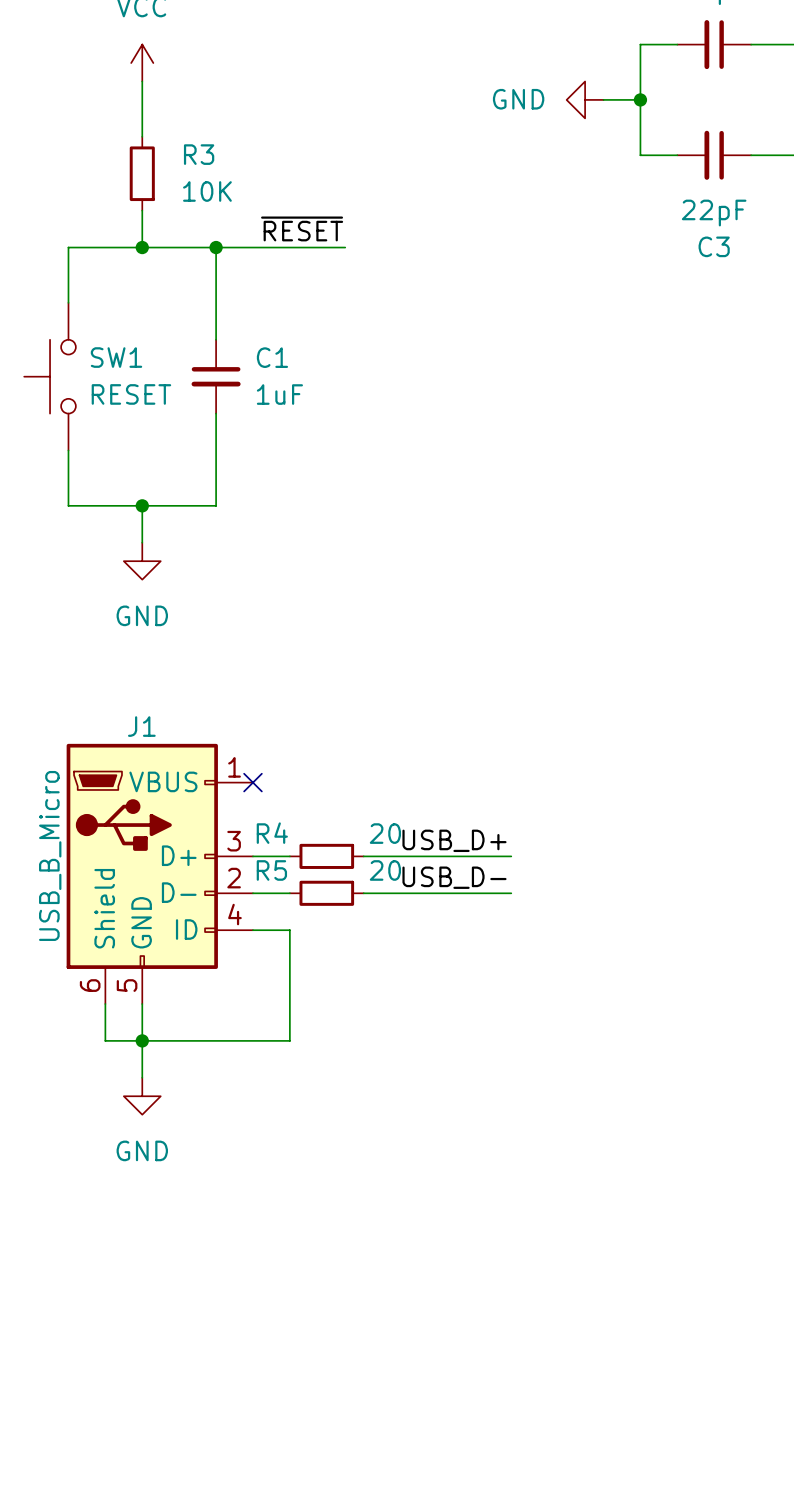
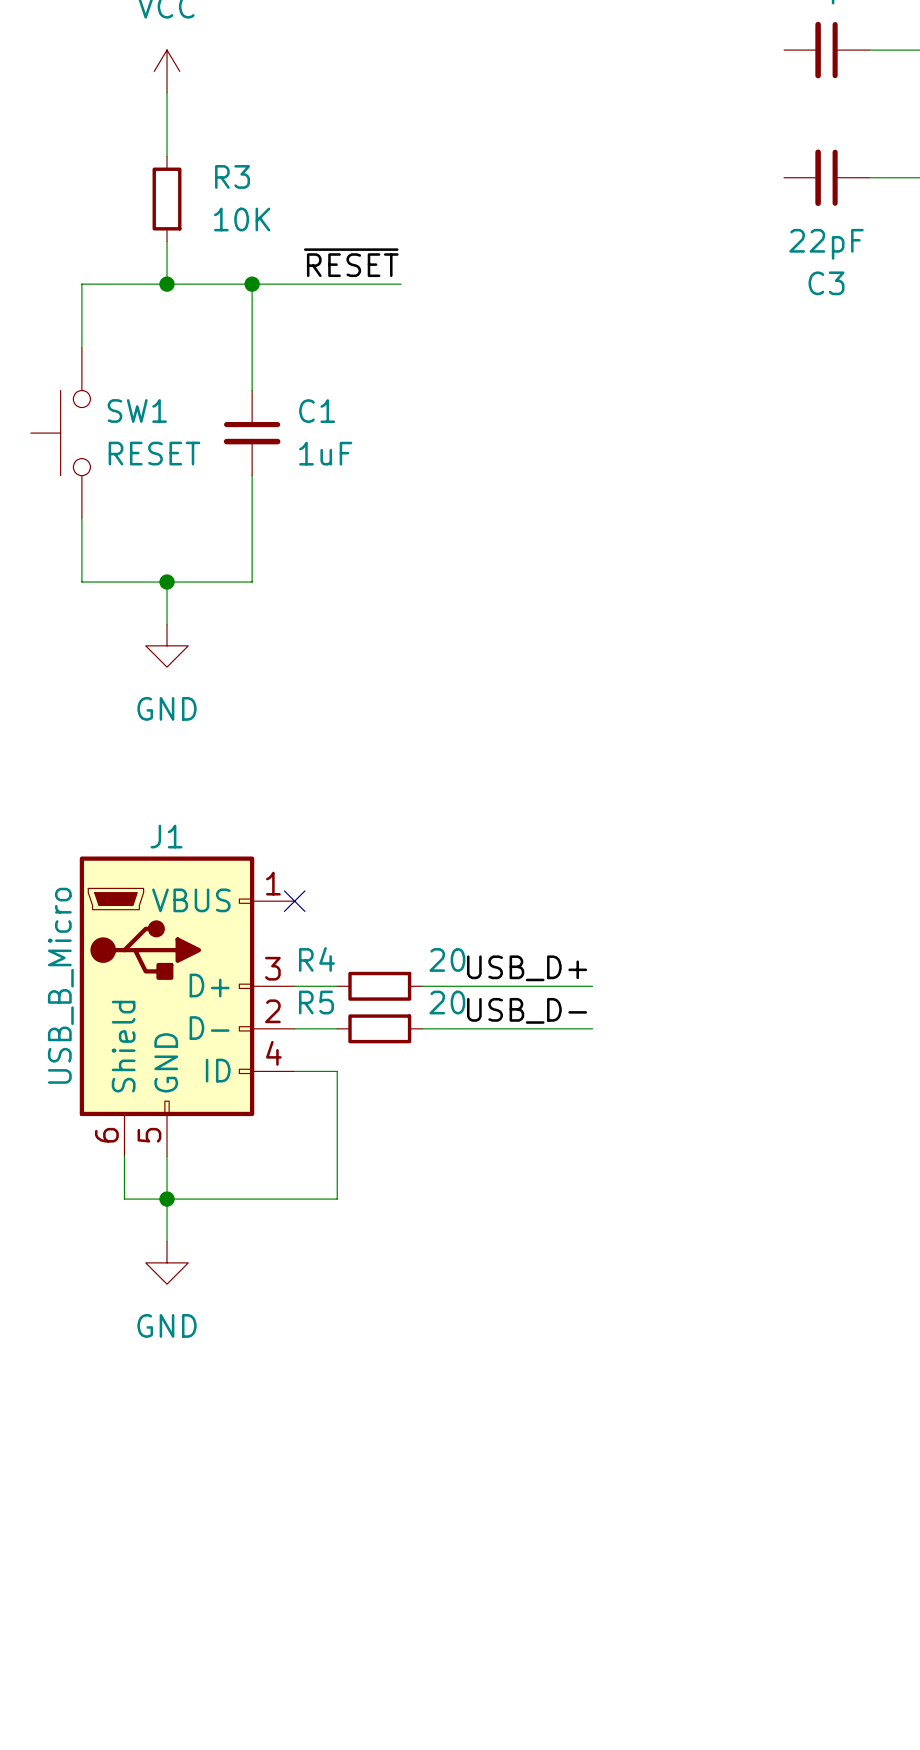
wire: (677, 44) (640, 44) (640, 155) (677, 155) -> none
power symbol: GND (585, 99) -> none
wire: (603, 99) (640, 99) -> none
junction: (640, 99) -> none

